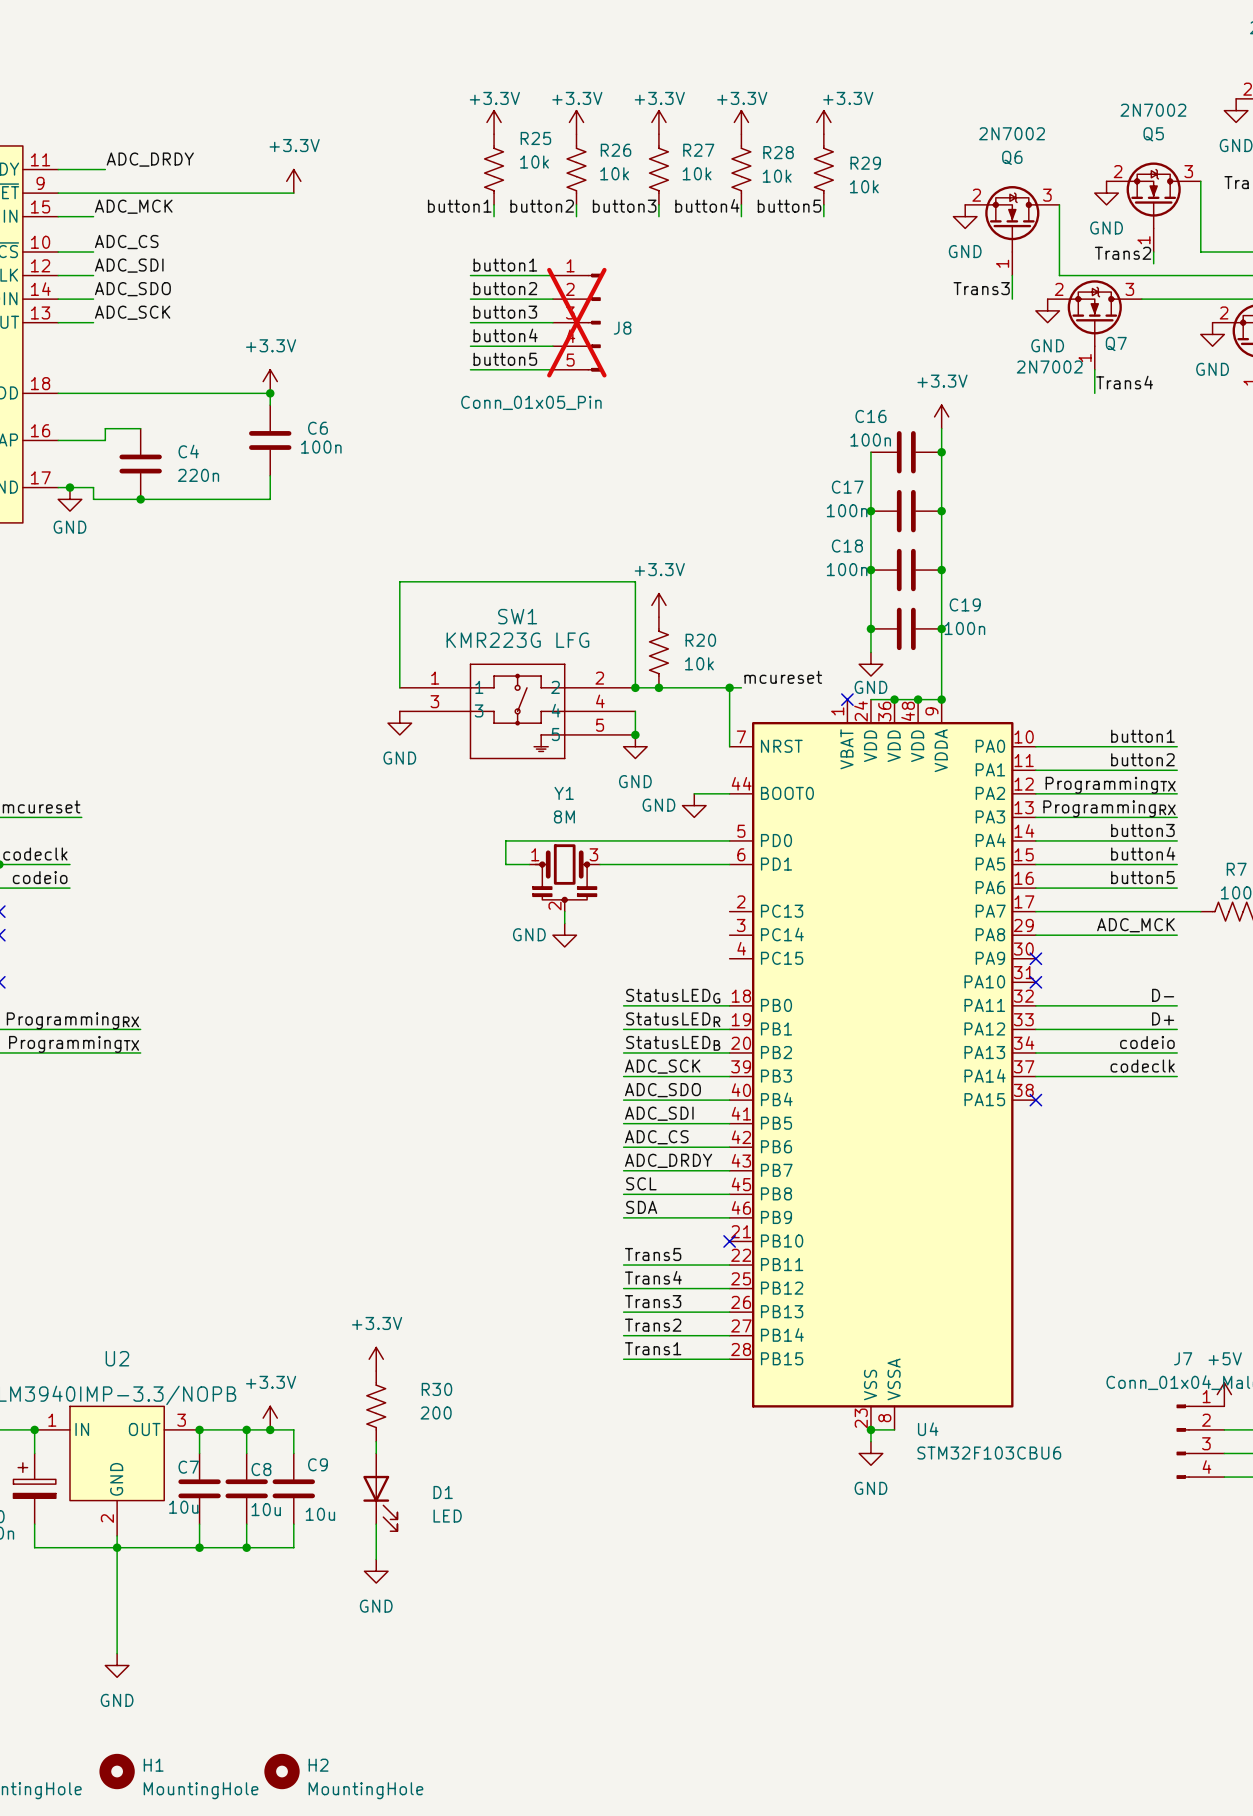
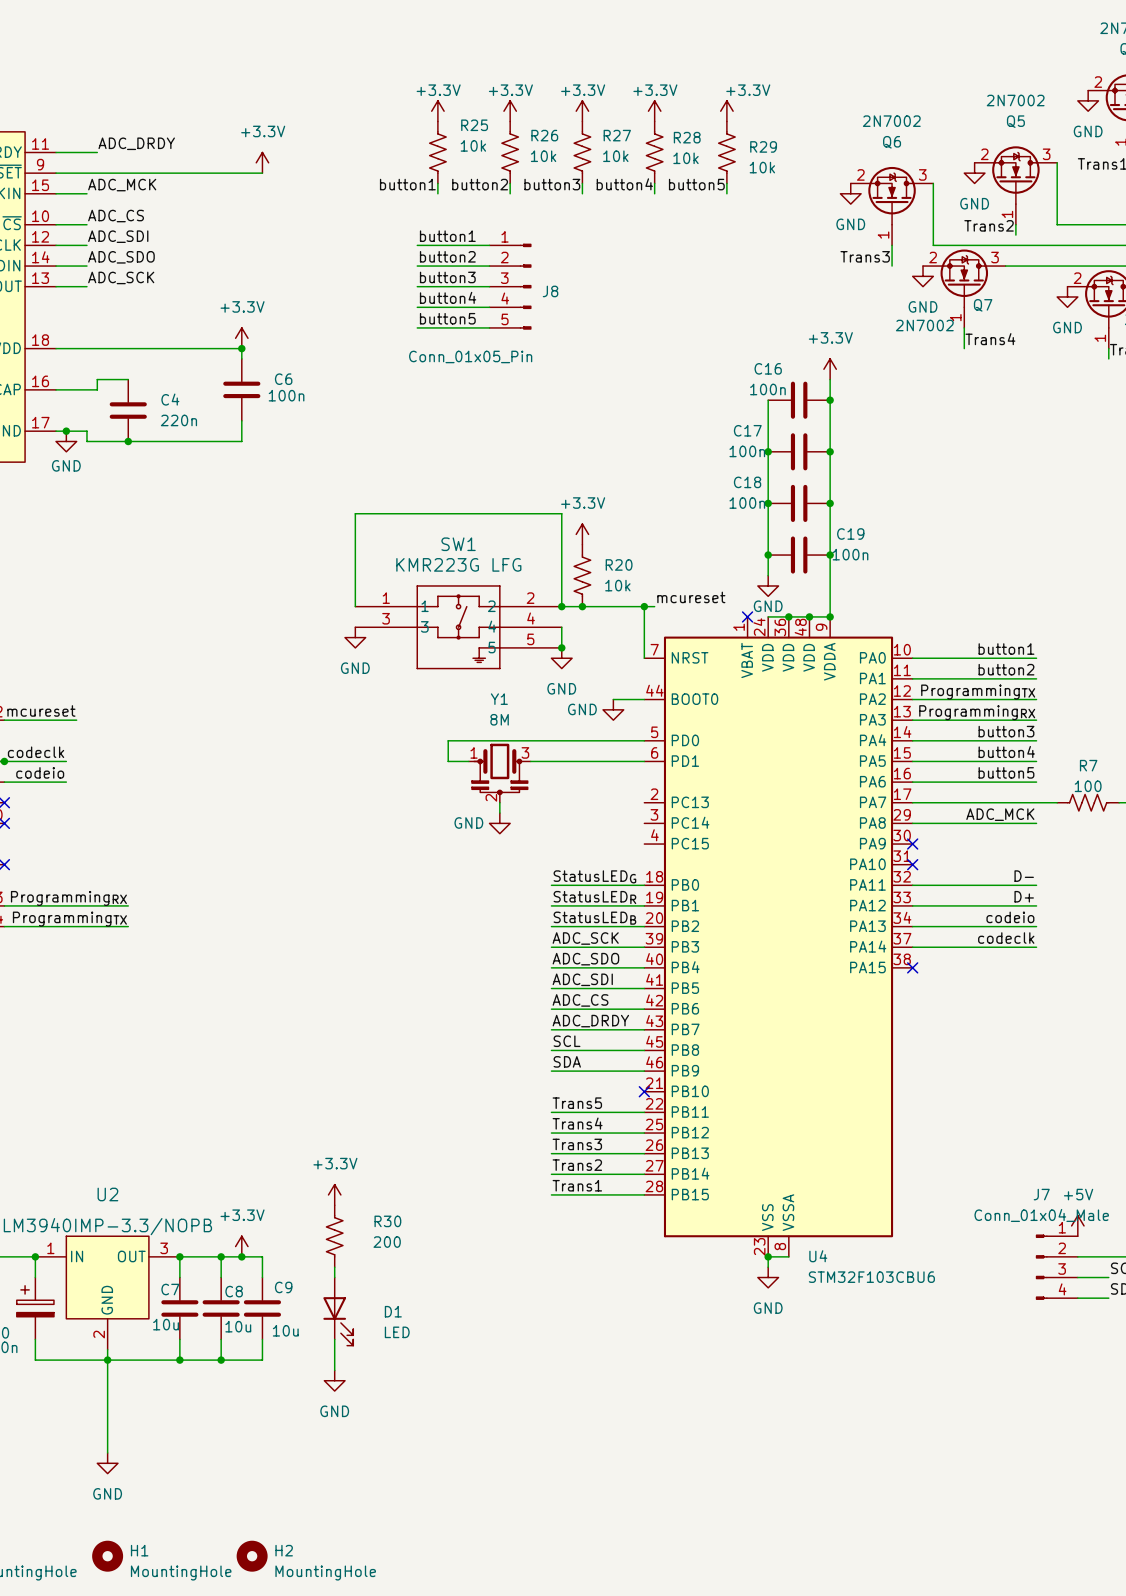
J8 do-not-place cross: (576, 322) -> none

